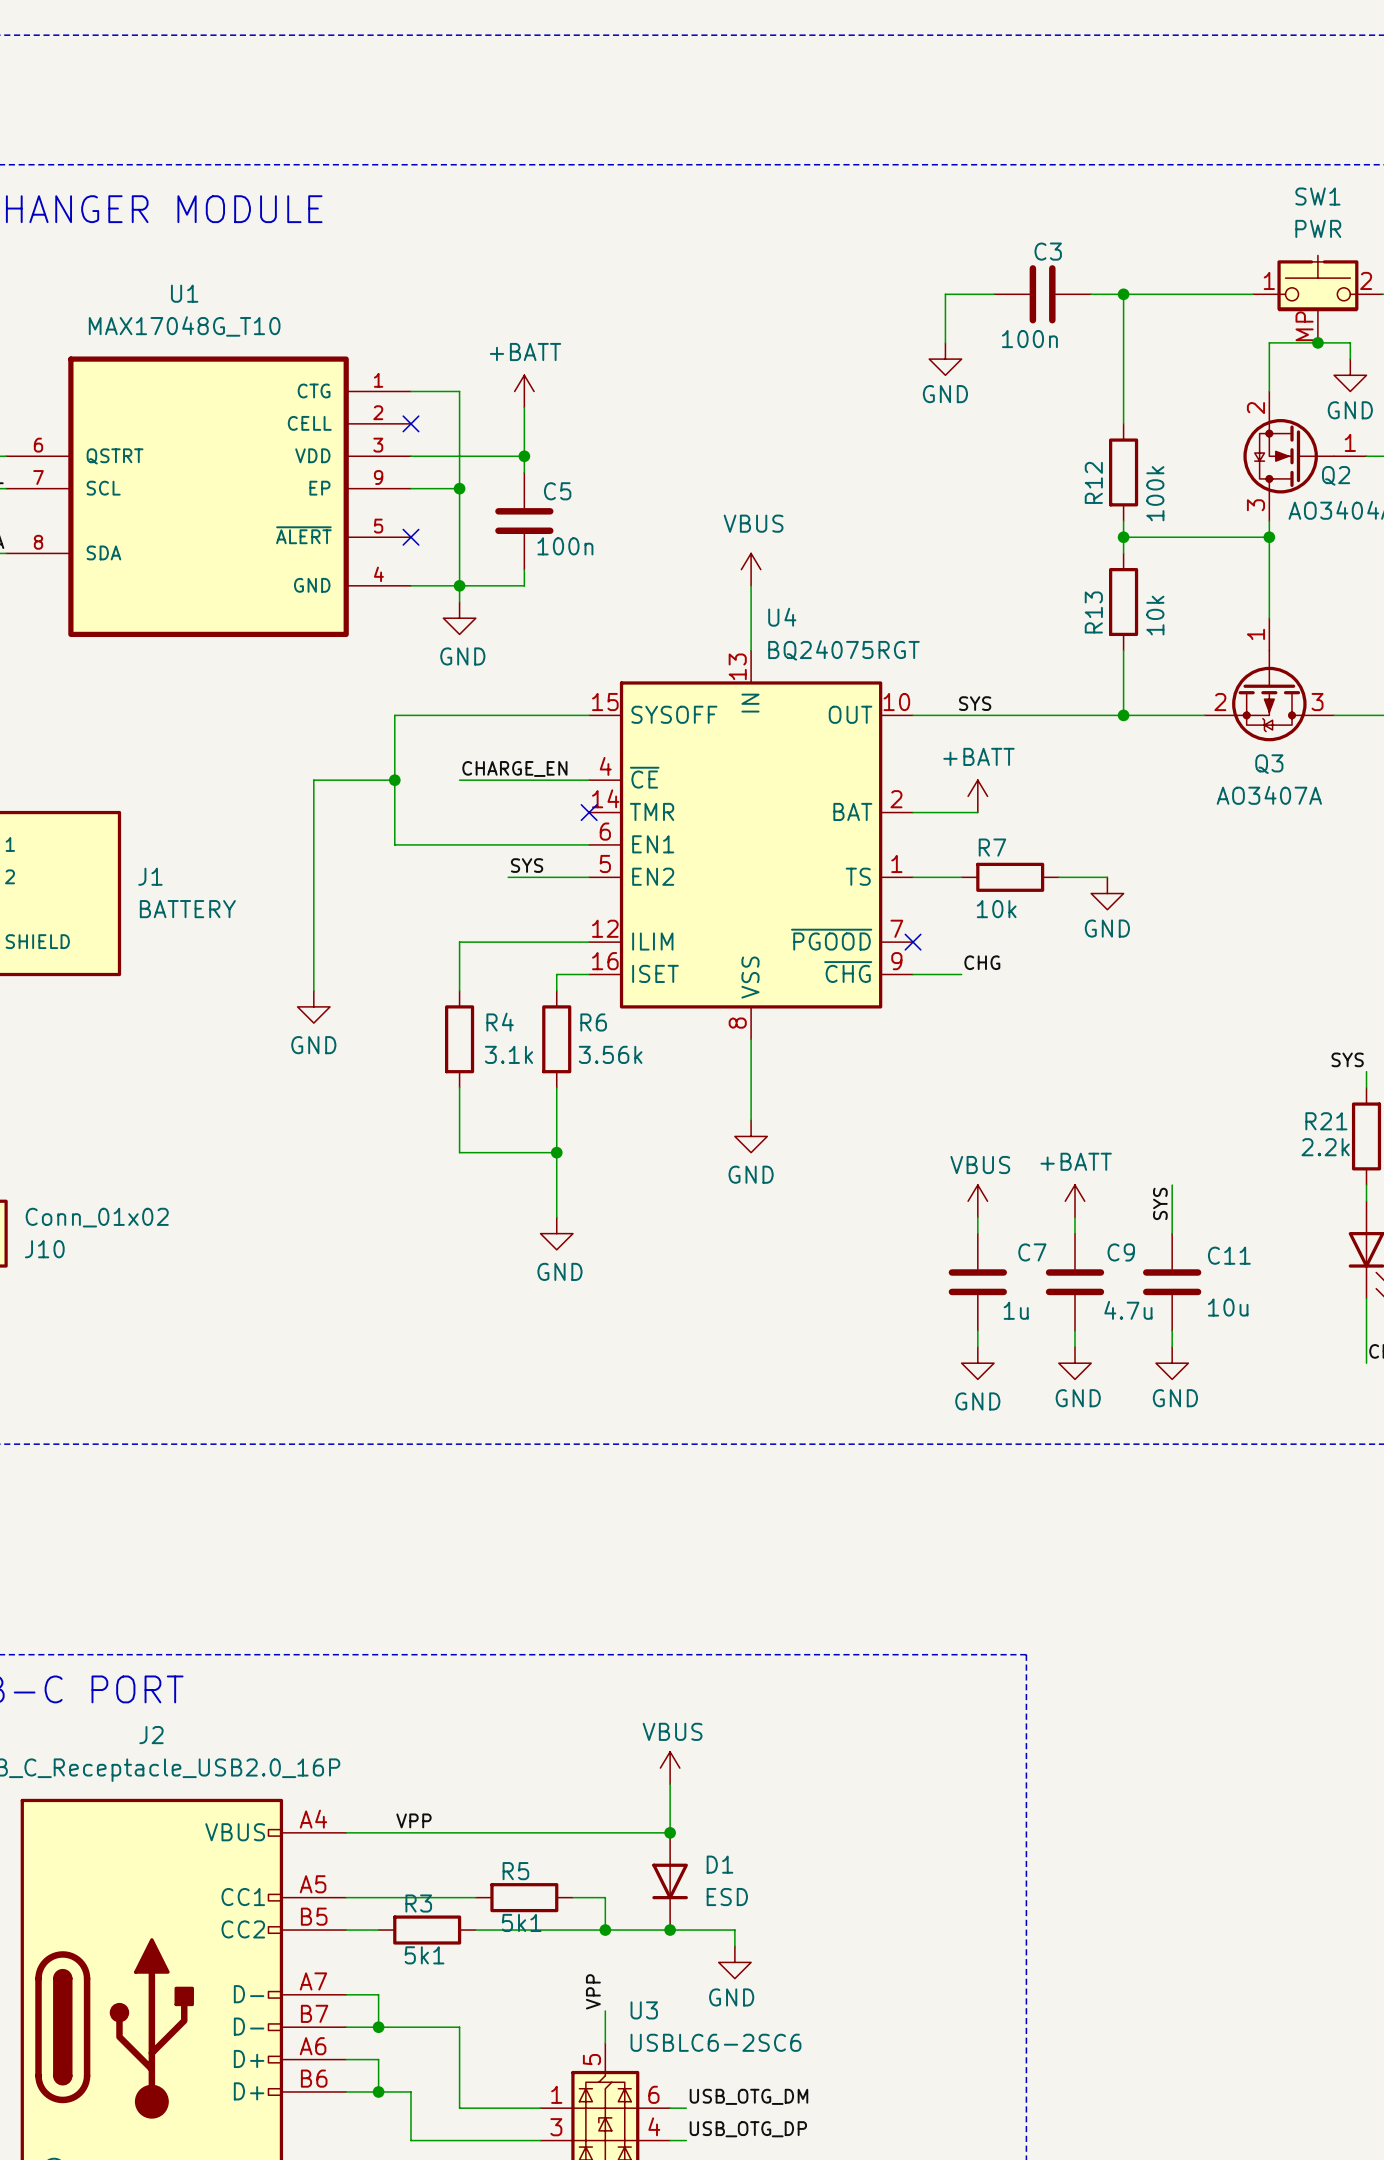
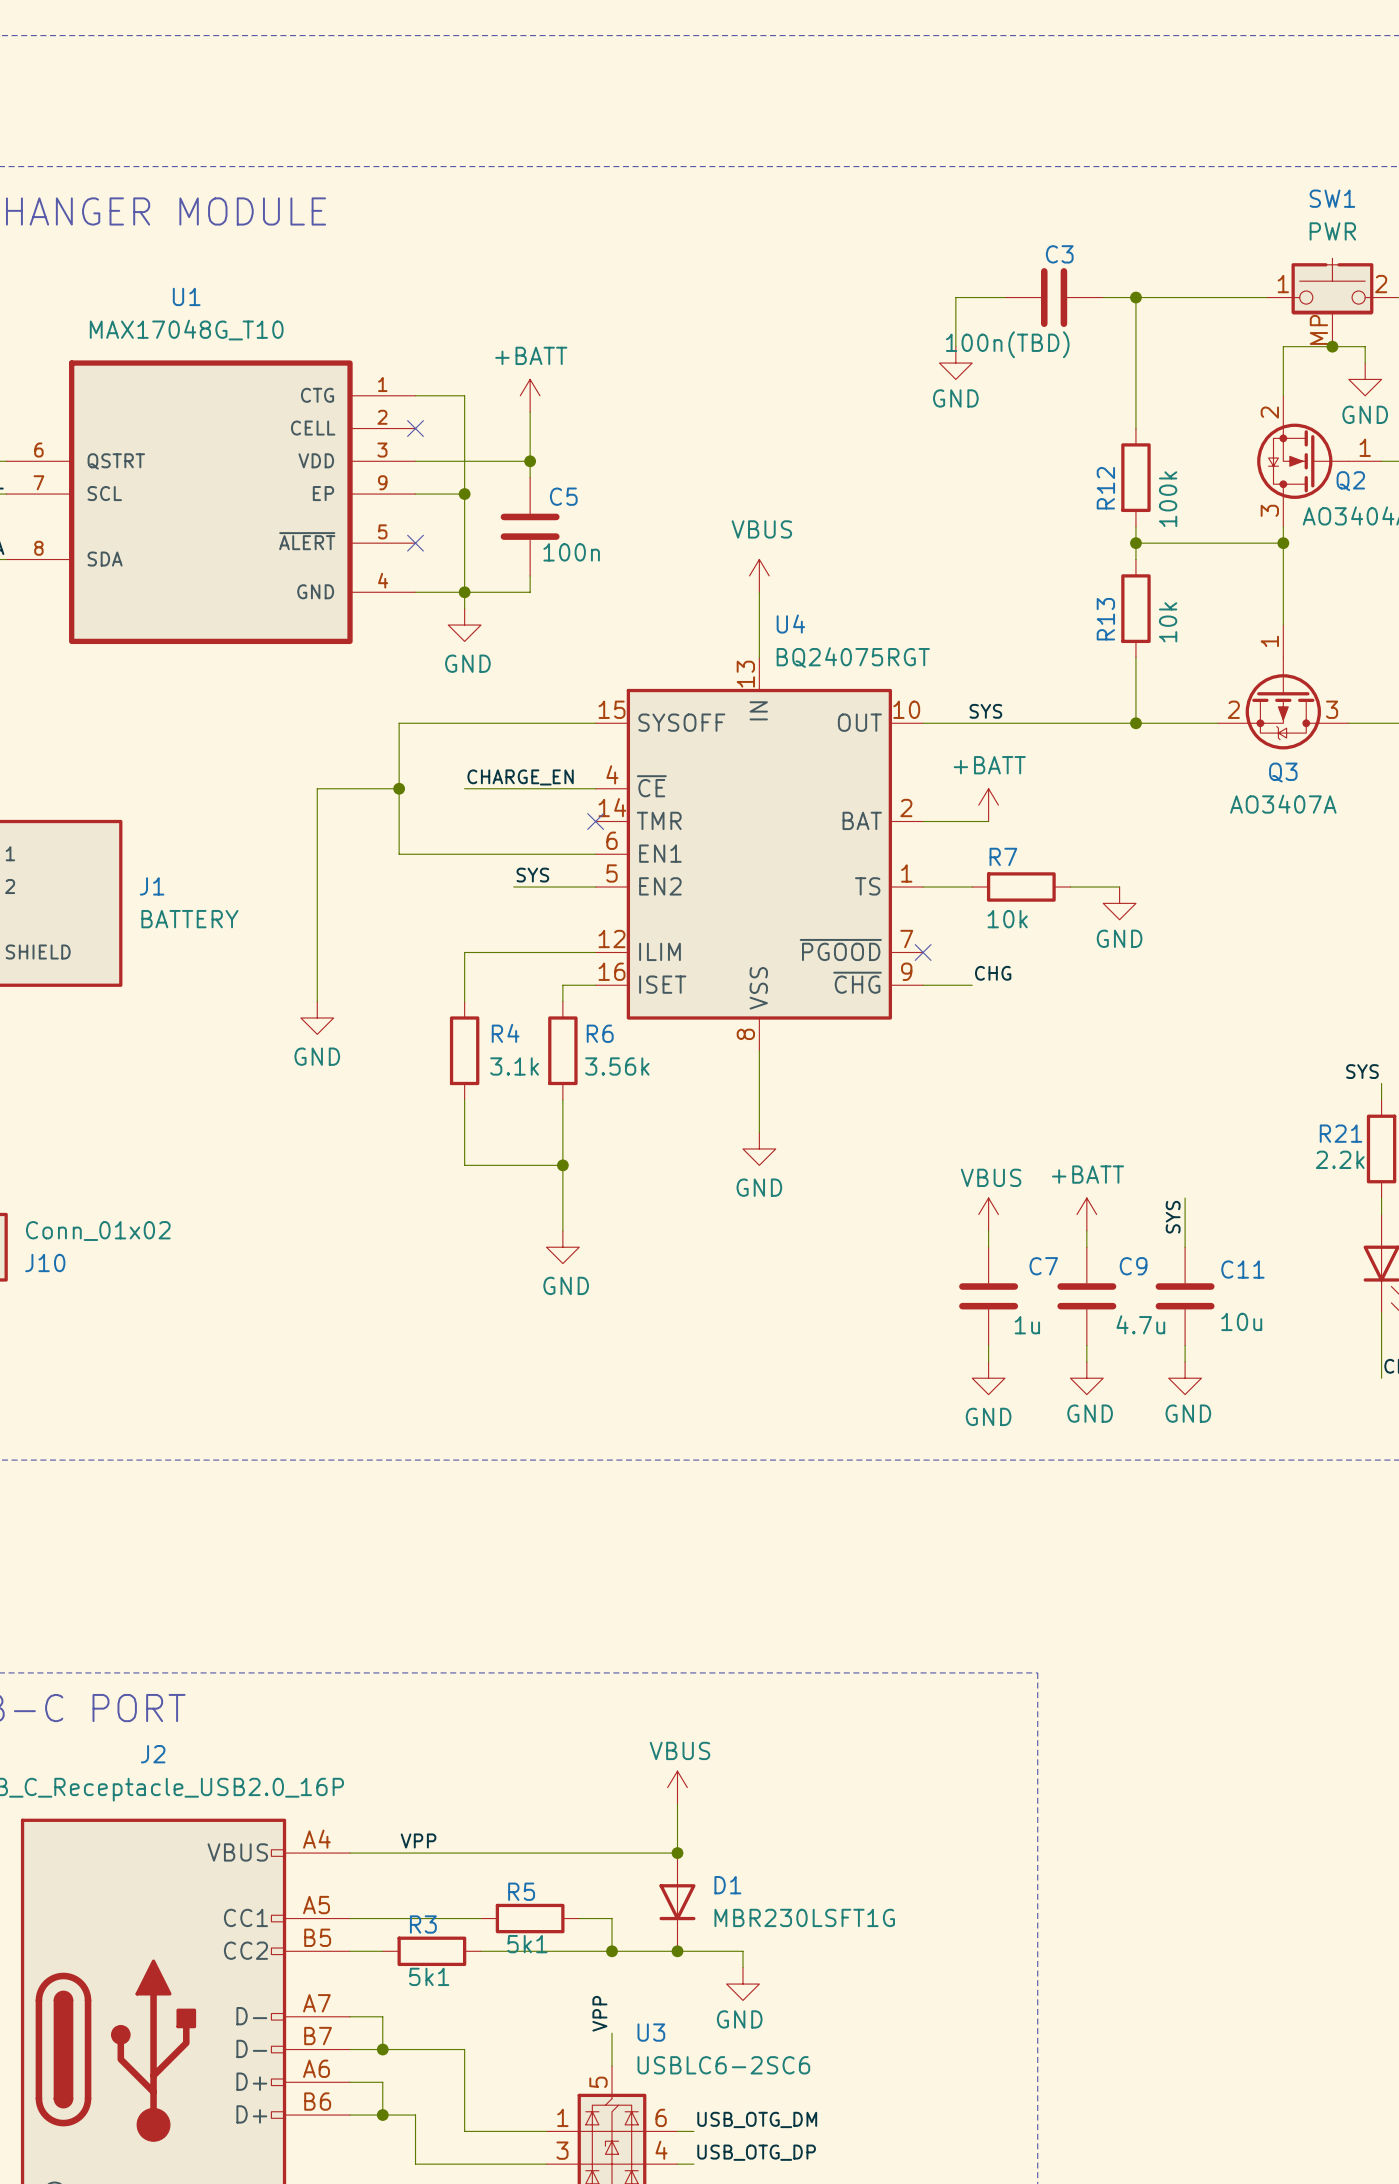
C3 value: 100n (1029, 339) -> 100n(TBD) (1007, 344)
D1 value: ESD (727, 1897) -> MBR230LSFT1G (804, 1917)

